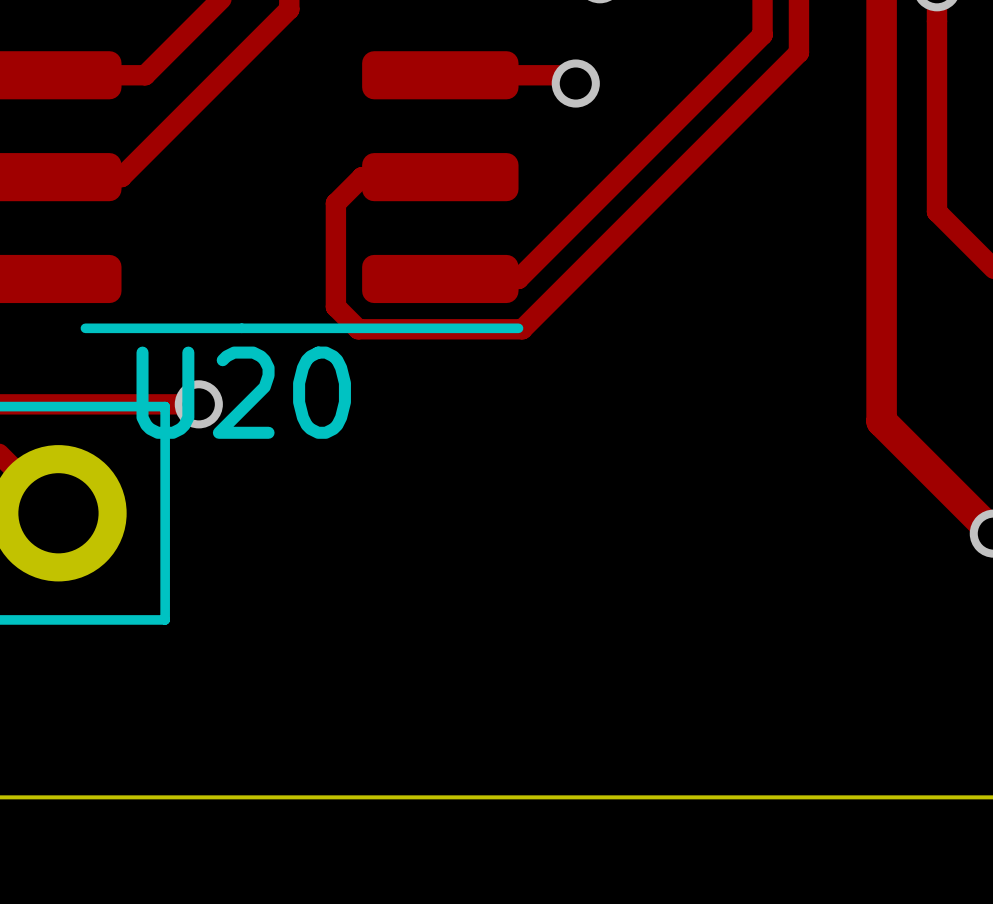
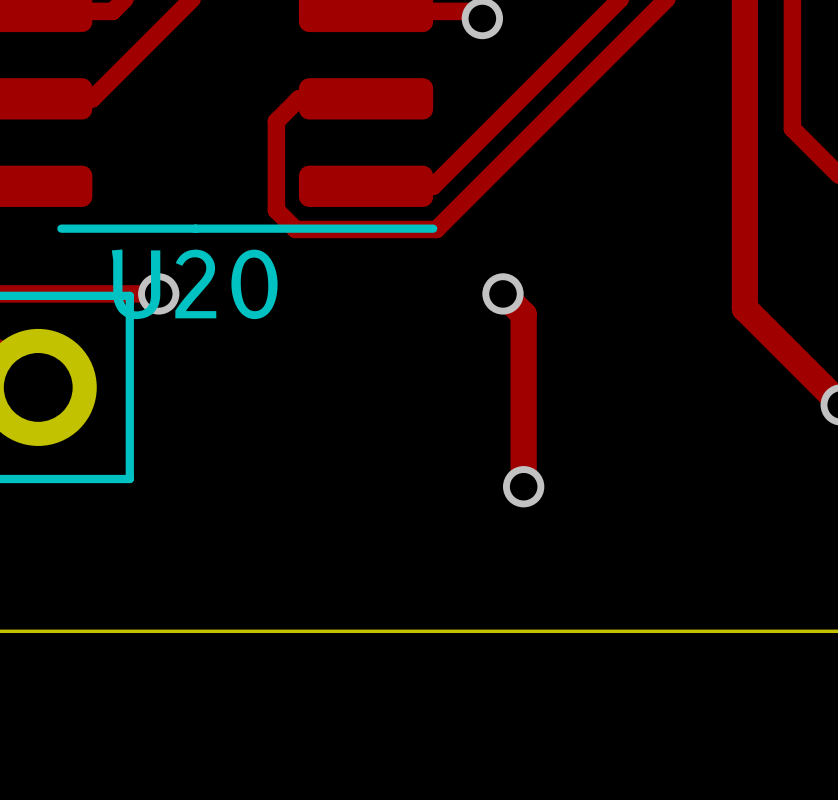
track: none -> (503, 293) (523, 314) (523, 486)
via: none -> (503, 293)
via: none -> (523, 486)

